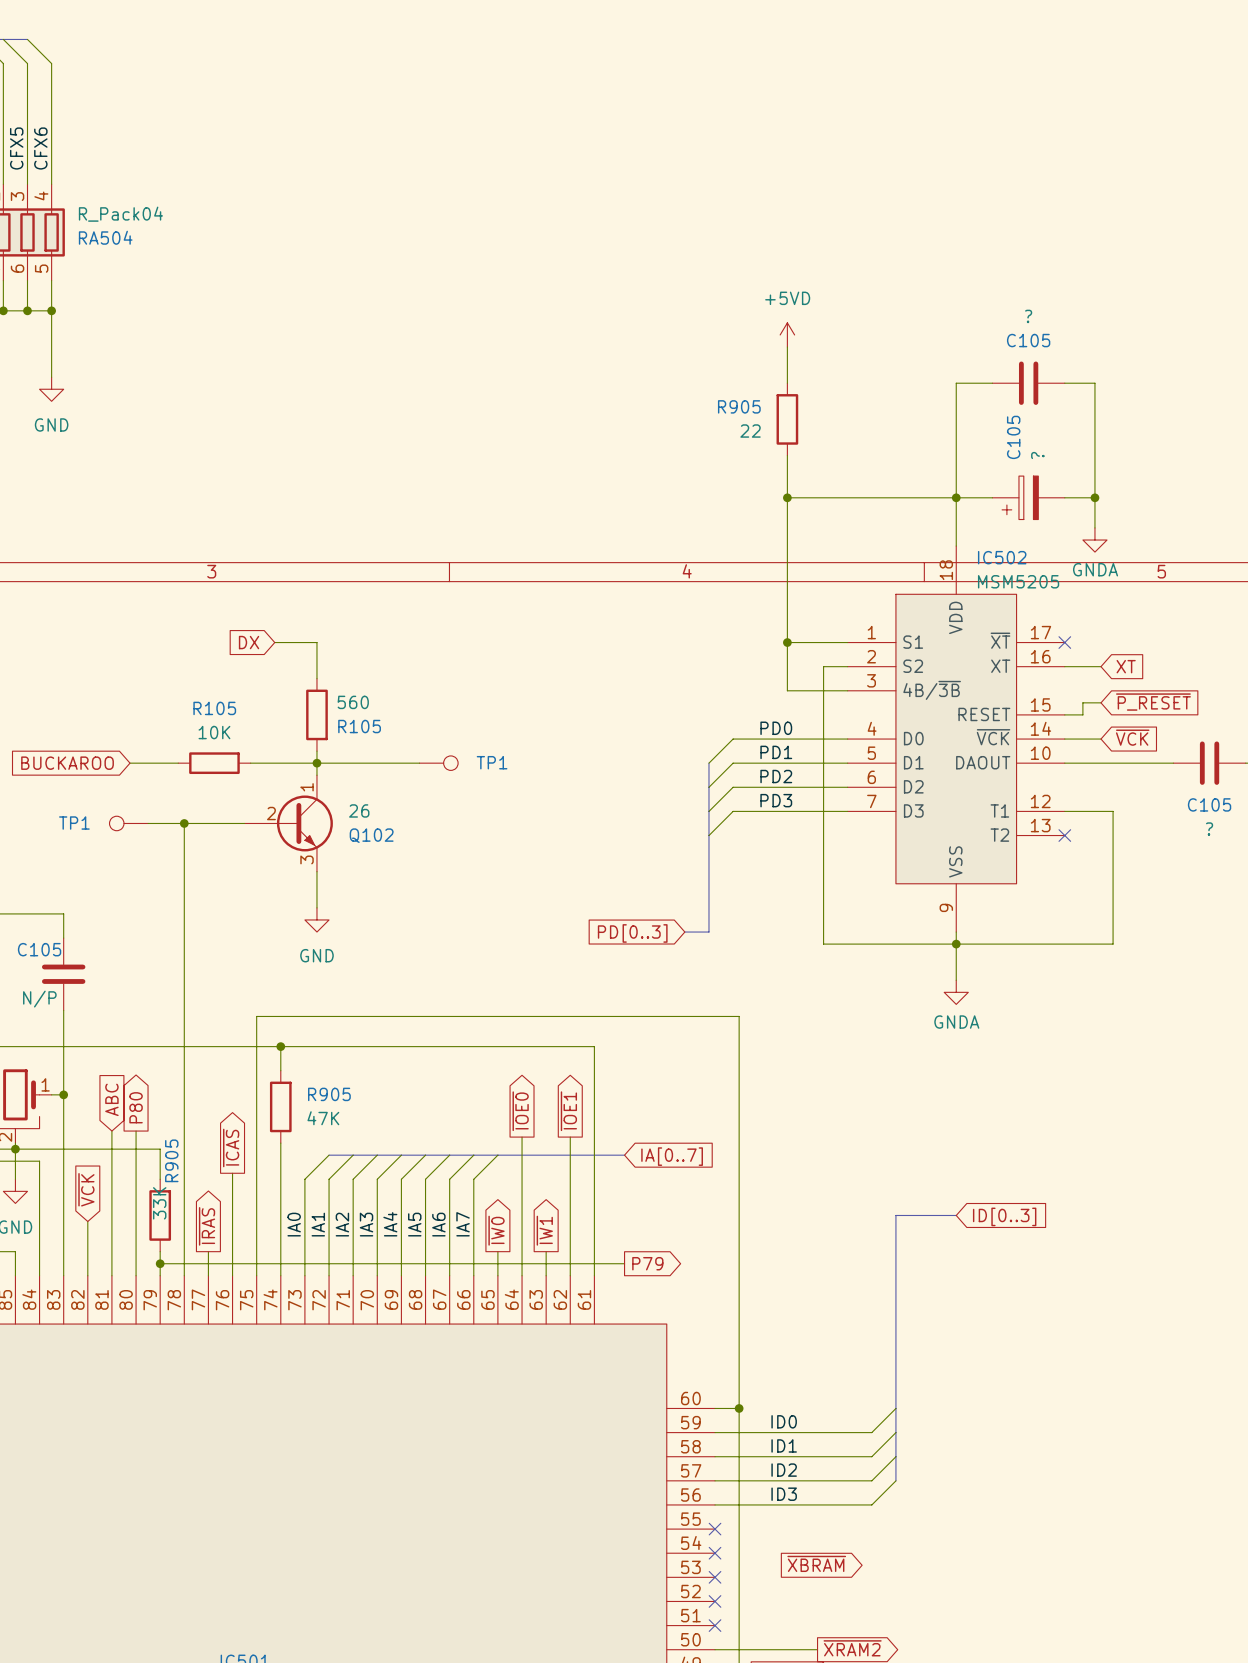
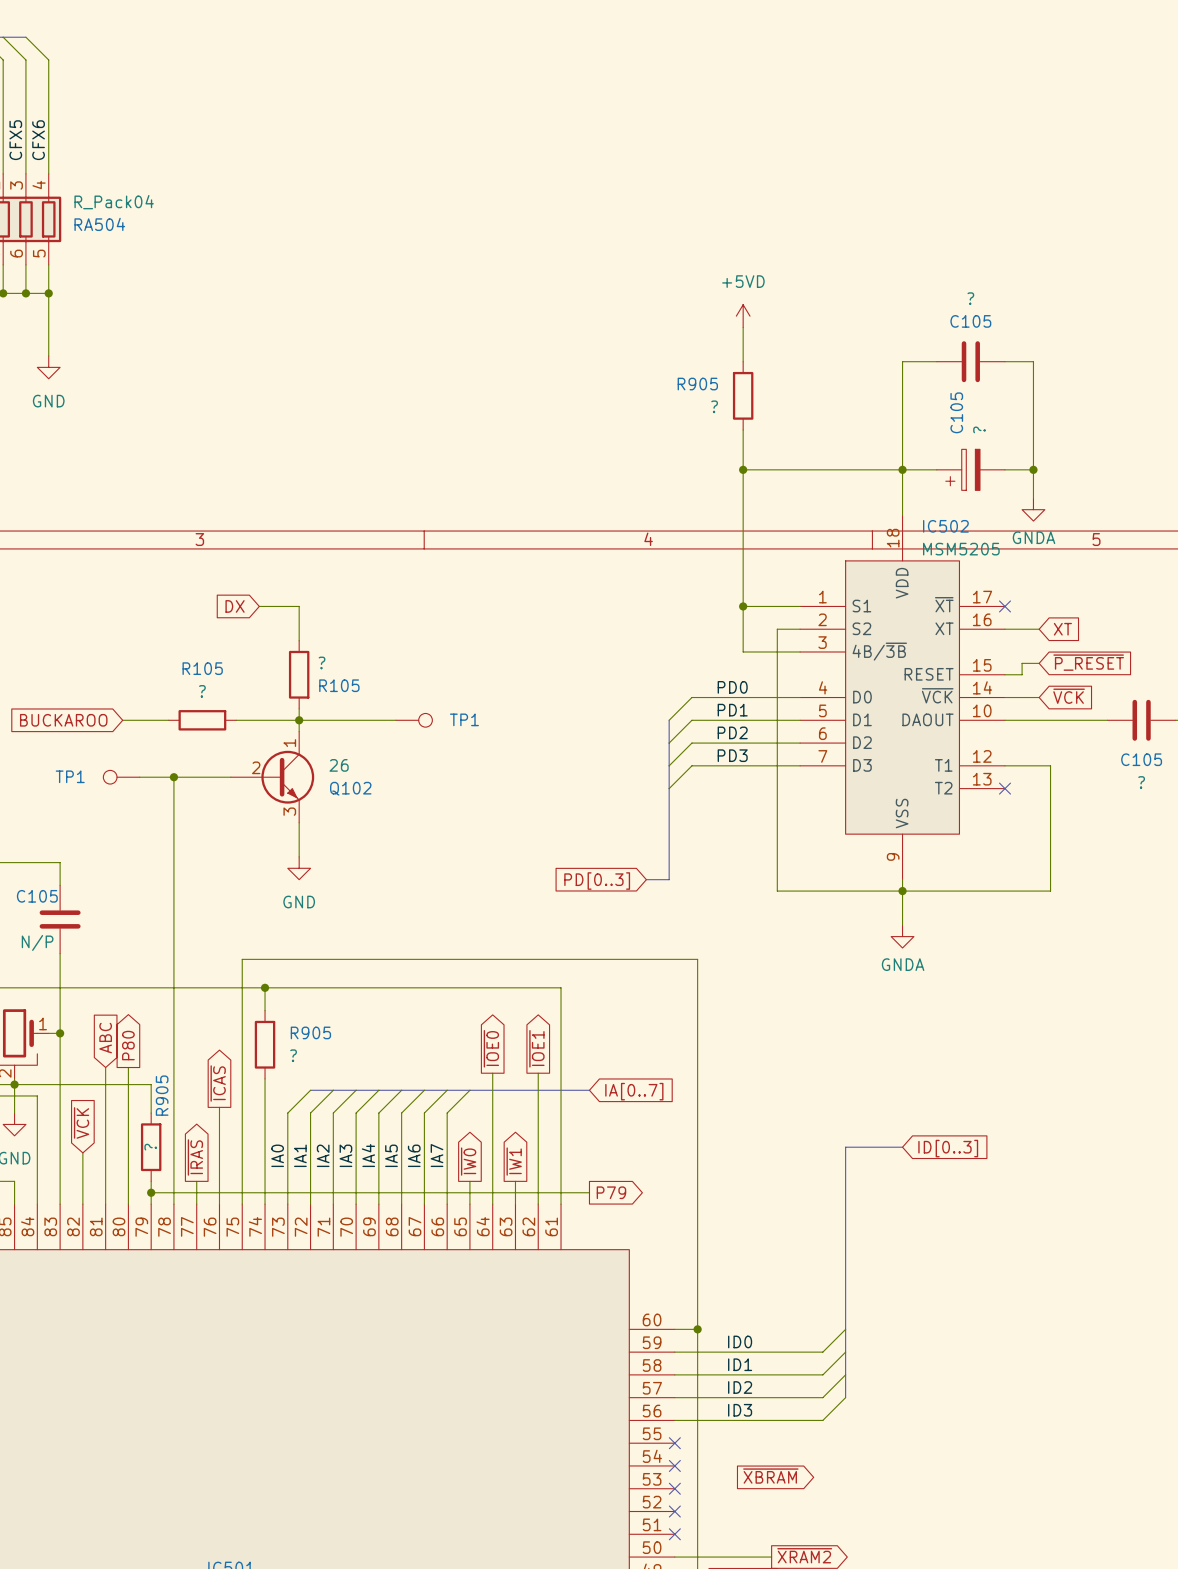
R905 value: 22 (750, 431) -> ? (714, 406)
R105 value: 560 (353, 702) -> ? (322, 662)
R105 value: 10K (214, 732) -> ? (202, 691)
R905 value: 47K (323, 1118) -> ? (293, 1055)
R905 value: 33K (159, 1203) -> ? (150, 1147)

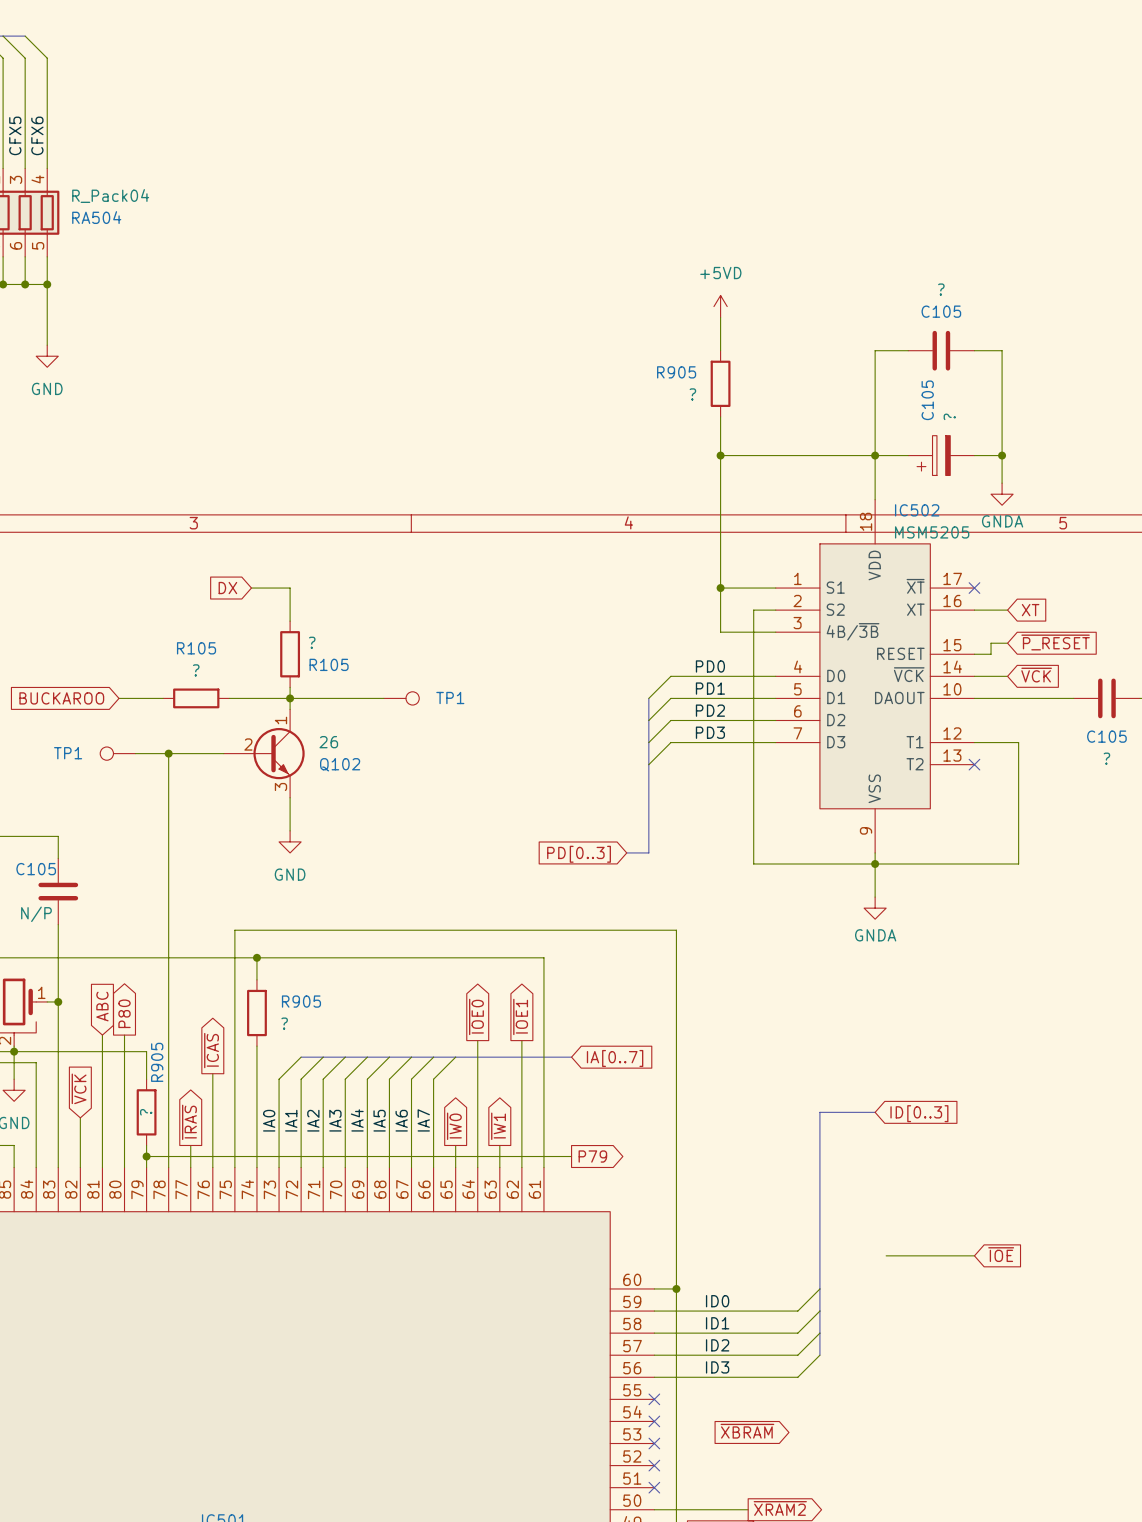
global label: none -> ~{IOE} (1001, 1254)
wire: none -> (886, 1255) (974, 1255)

